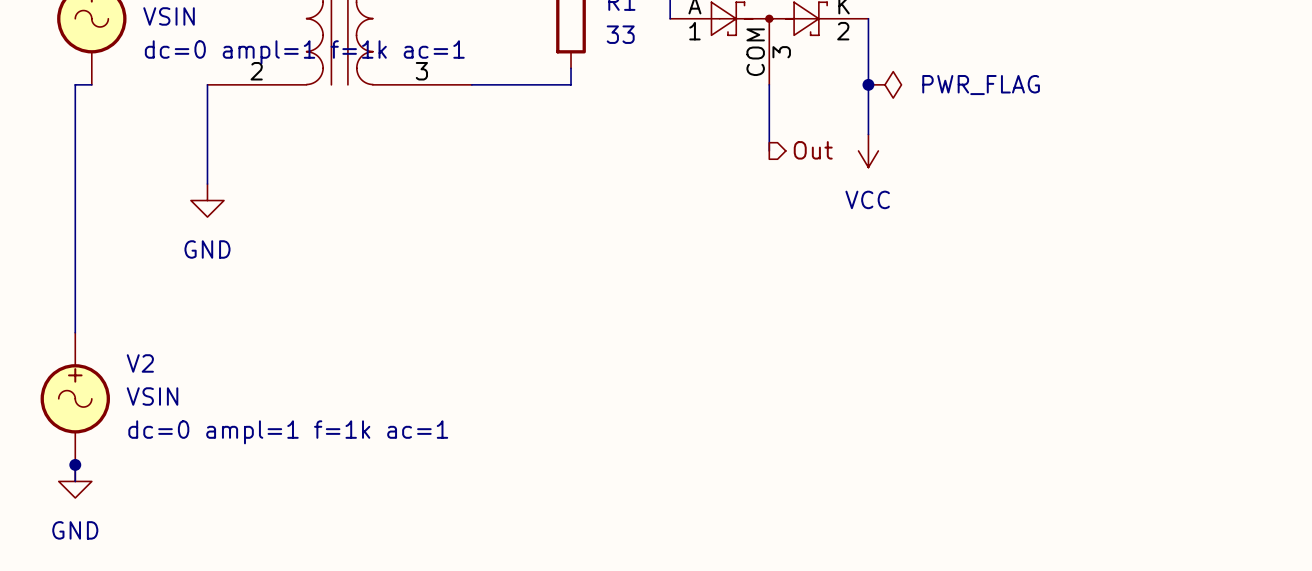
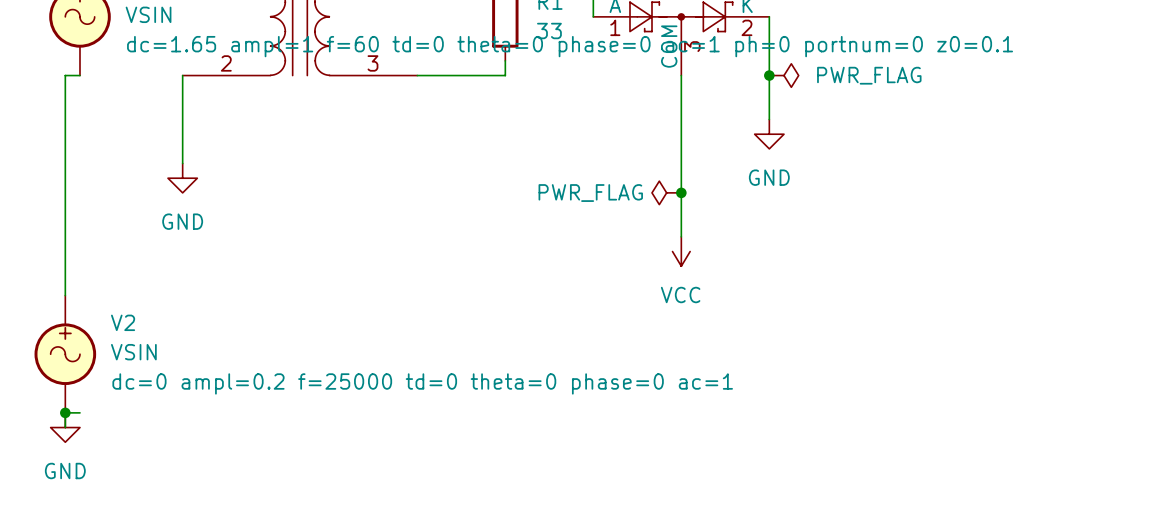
part text: dc=0 ampl=1 f=1k ac=1 (304, 52) -> dc=1.65 ampl=1 f=60 td=0 theta=0 phase=0 ac=1 ph=0 portnum=0 z0=0.1 (570, 46)
wire: none -> (681, 134) (681, 236)
hierarchical label: Out (813, 150) -> none
power symbol: VCC (868, 150) -> GND (769, 134)
power symbol: none -> PWR_FLAG (666, 192)
junction: none -> (681, 192)
power symbol: none -> VCC (681, 251)
V2 text: dc=0 ampl=1 f=1k ac=1 (288, 432) -> dc=0 ampl=0.2 f=25000 td=0 theta=0 phase=0 ac=1 (422, 383)
wire: none -> (65, 412) (79, 412)

